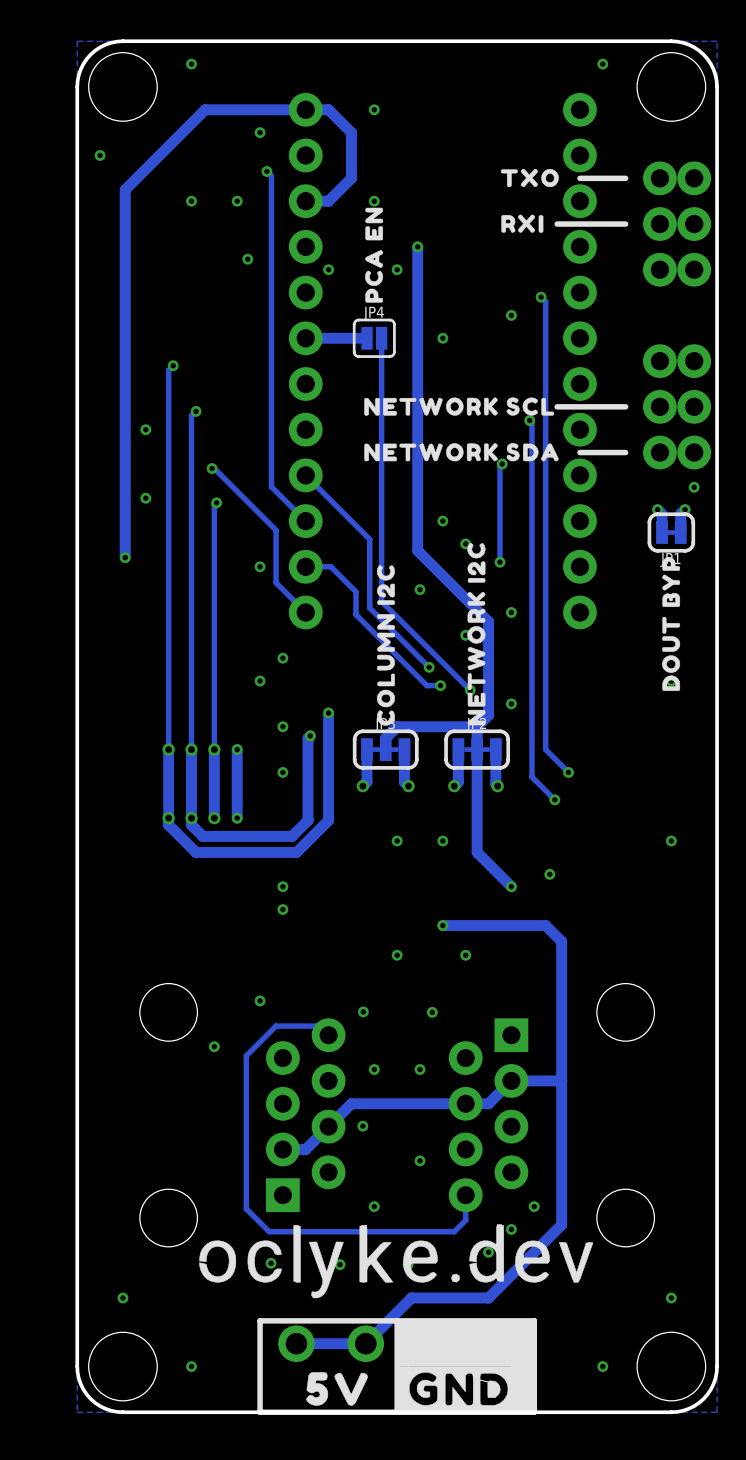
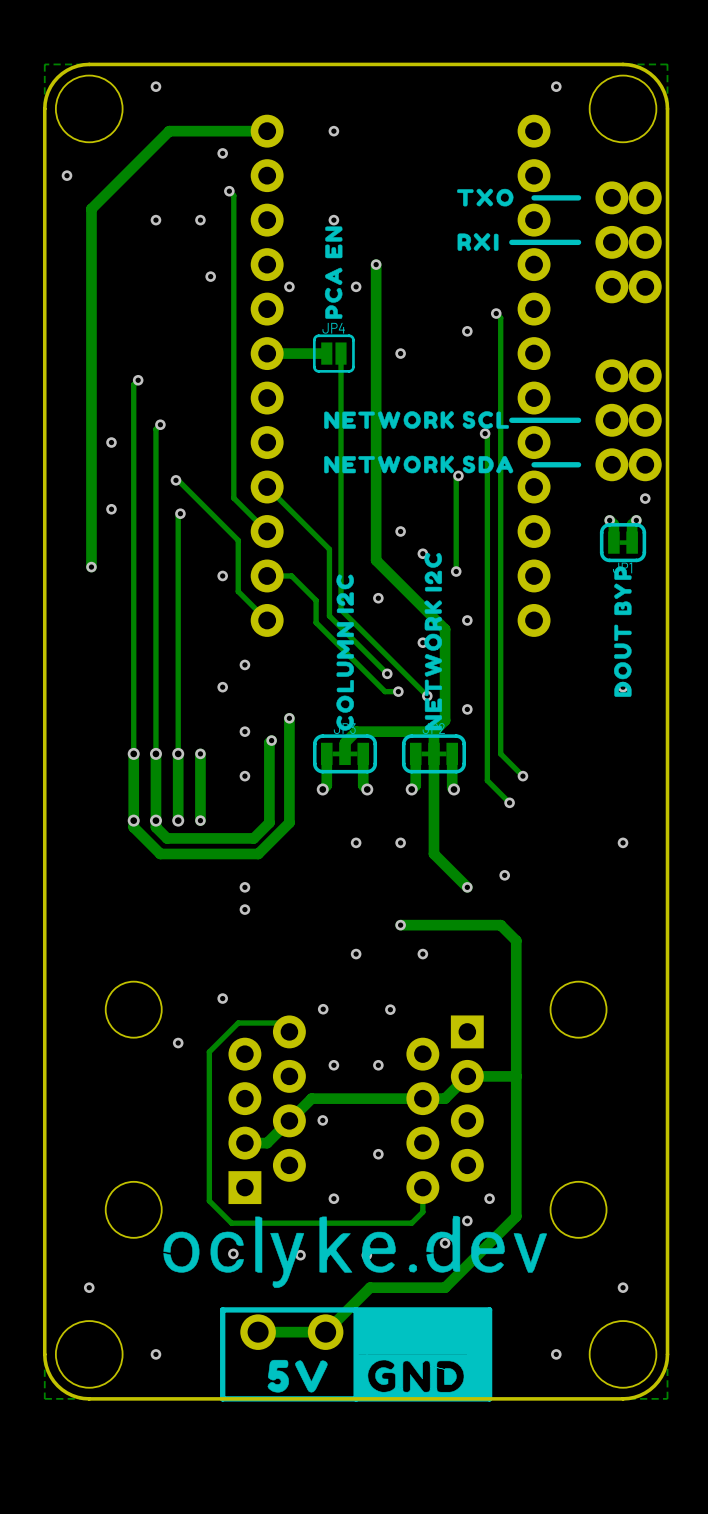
track: (305, 109) (328, 109) (351, 132) (351, 178) (328, 201) (305, 201) -> none

